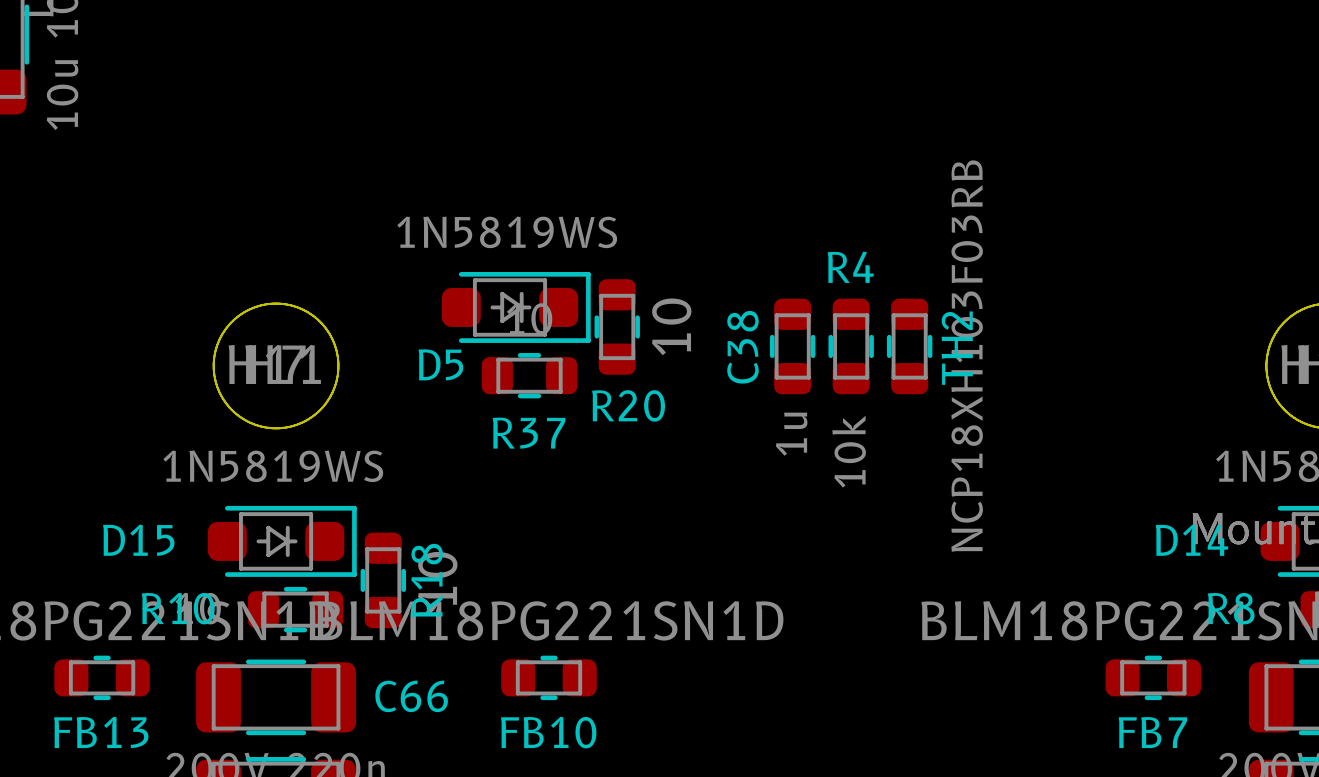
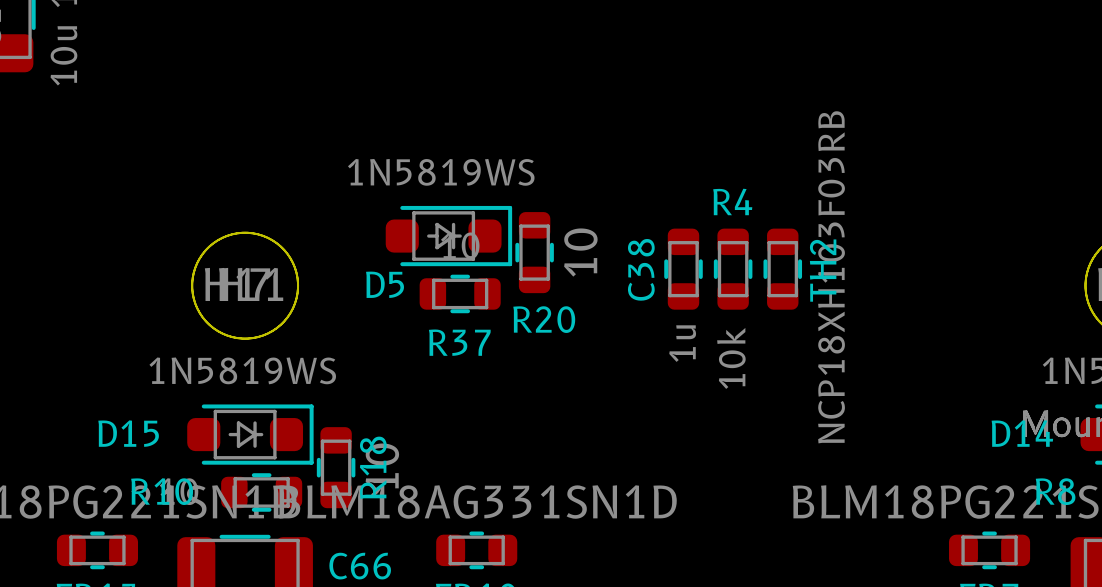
FB10 value: BLM18PG221SN1D (550, 620) -> BLM18AG331SN1D (477, 502)

